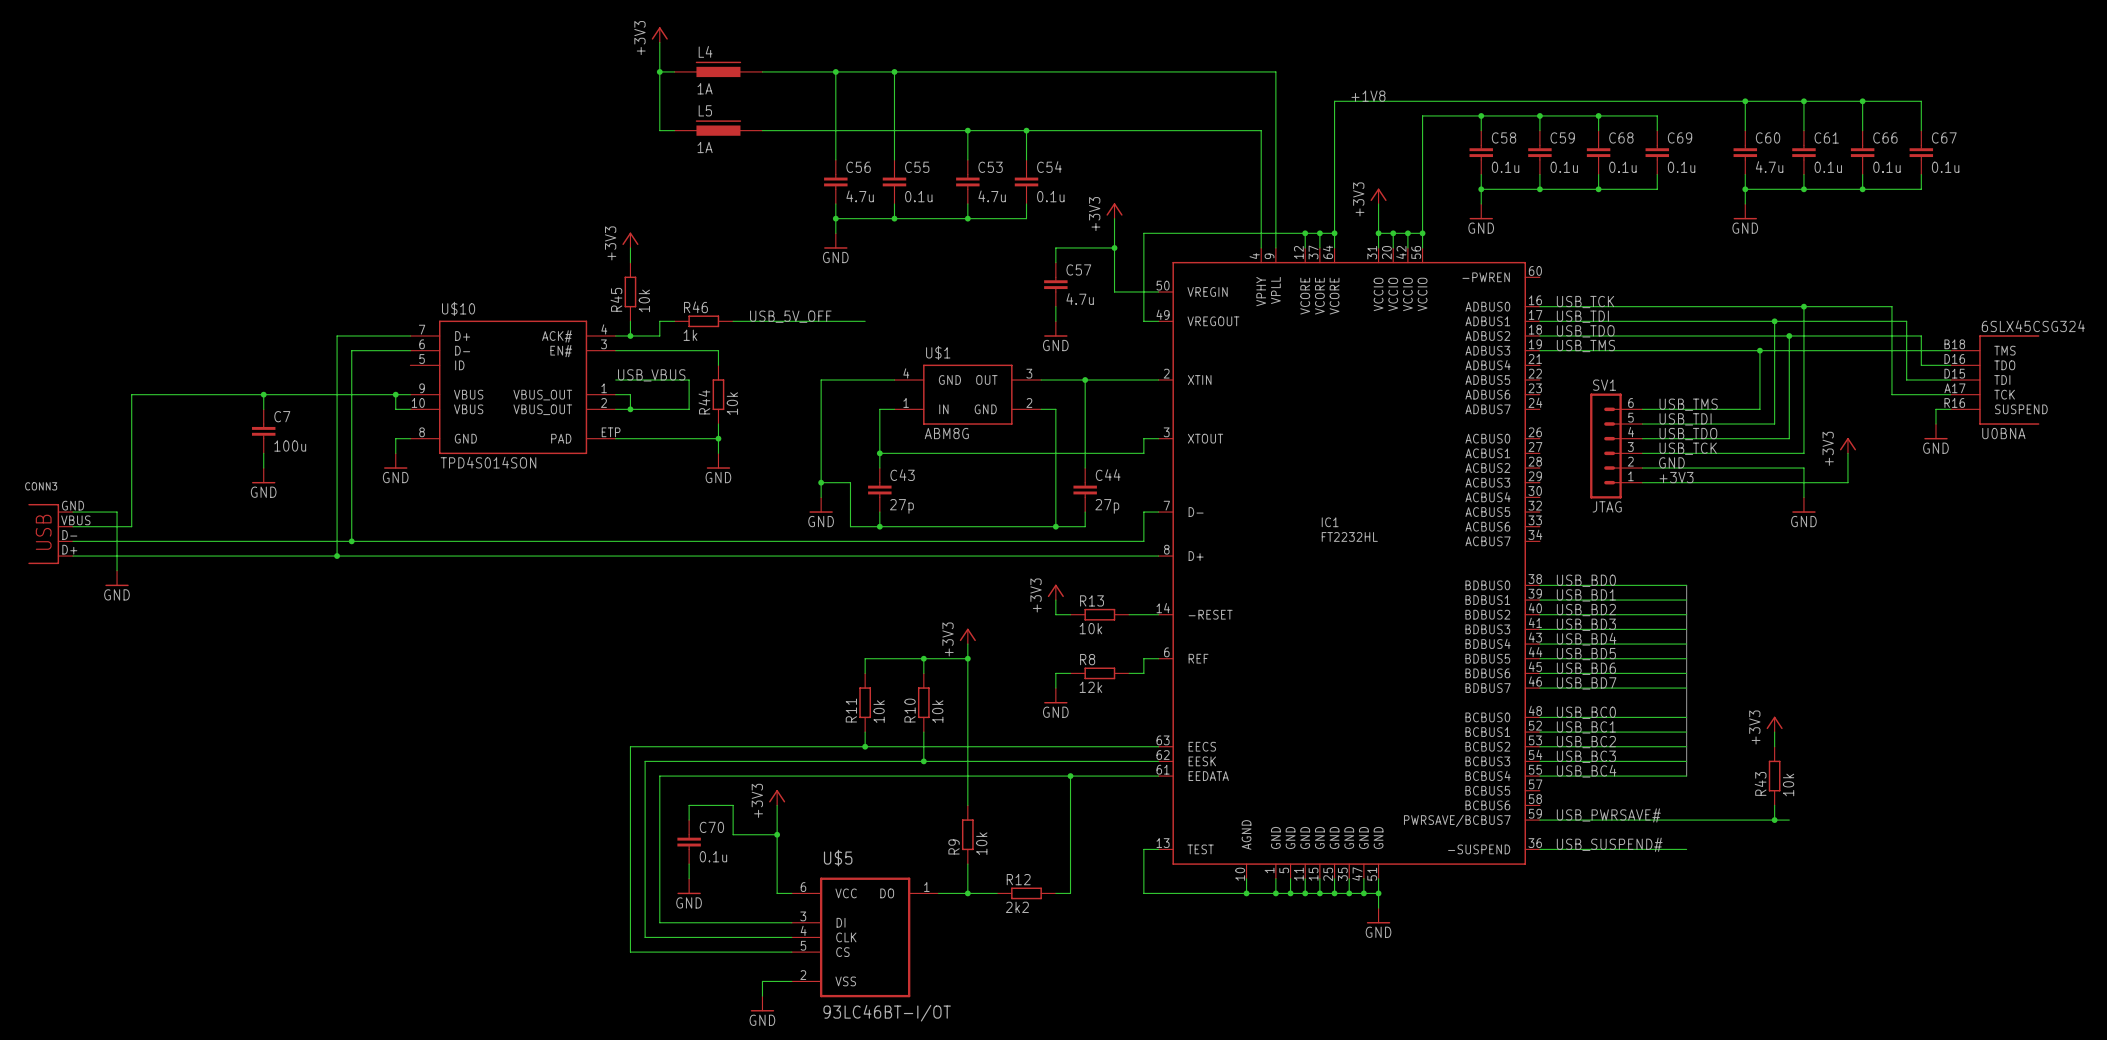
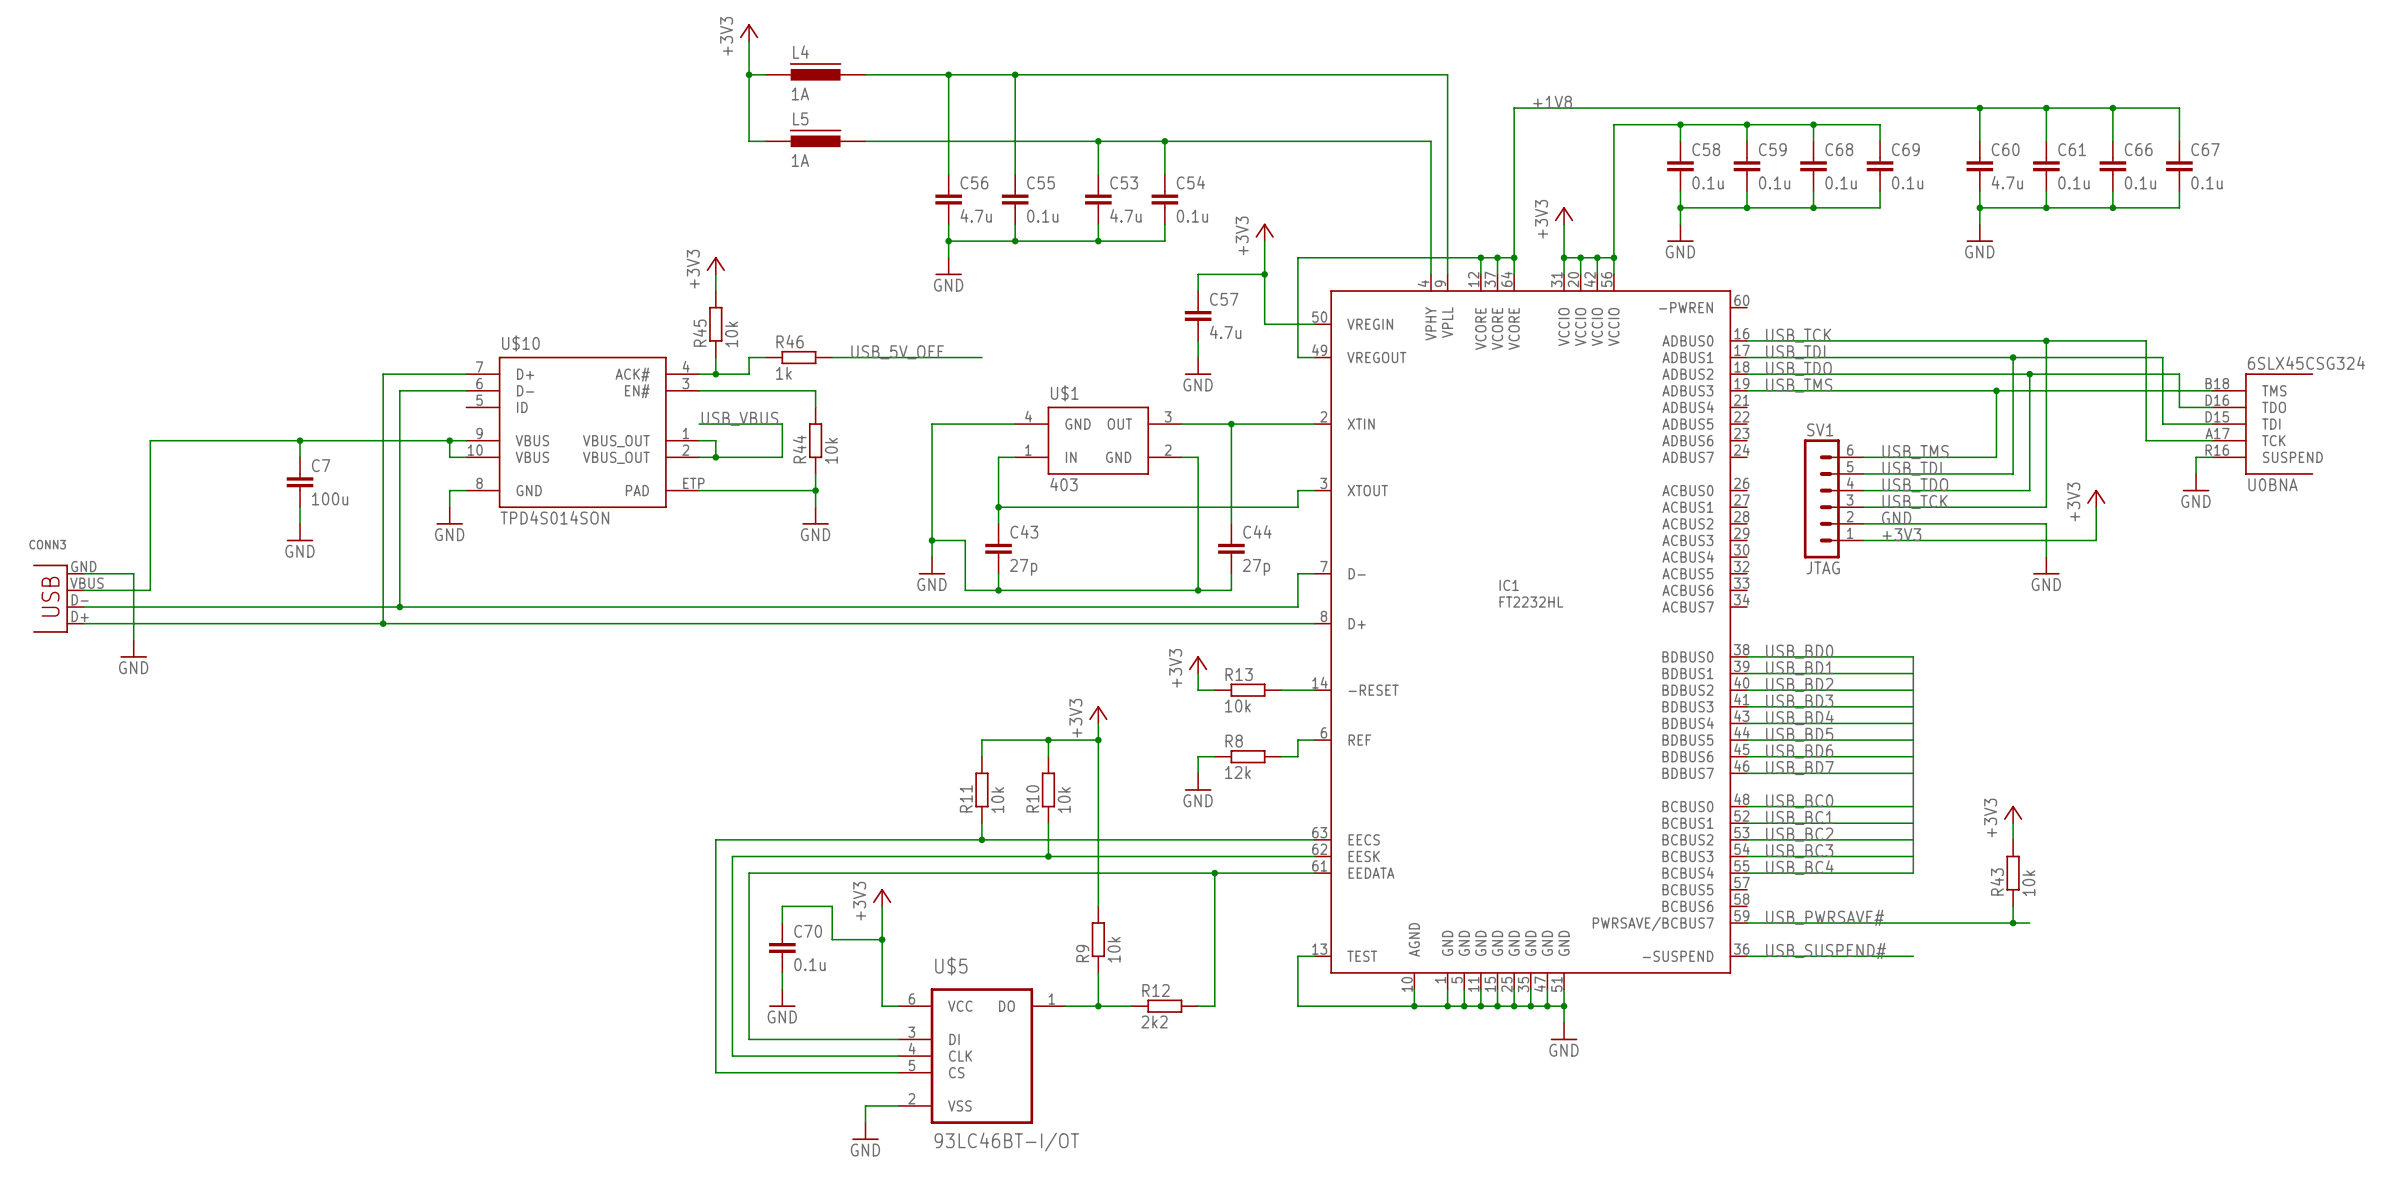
U$1 value: ABM8G (946, 433) -> 403 (1064, 484)

